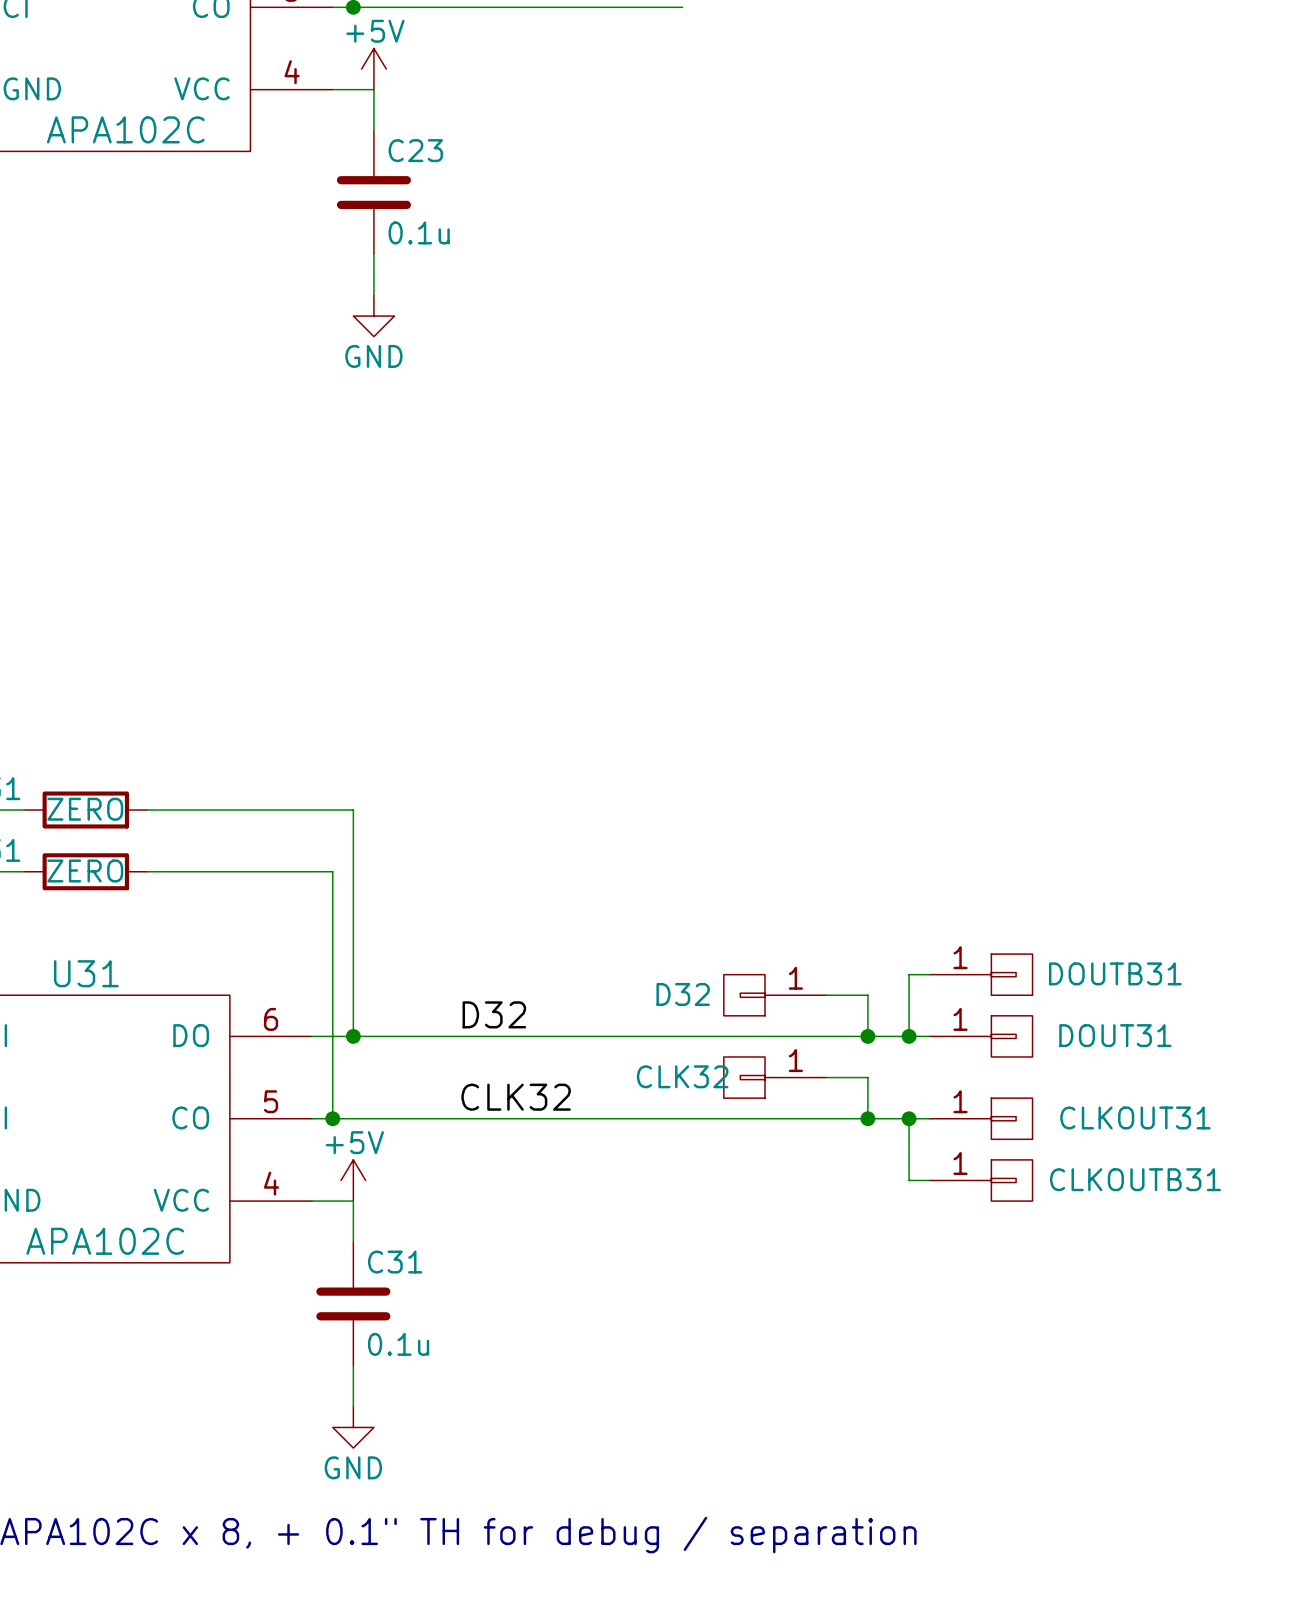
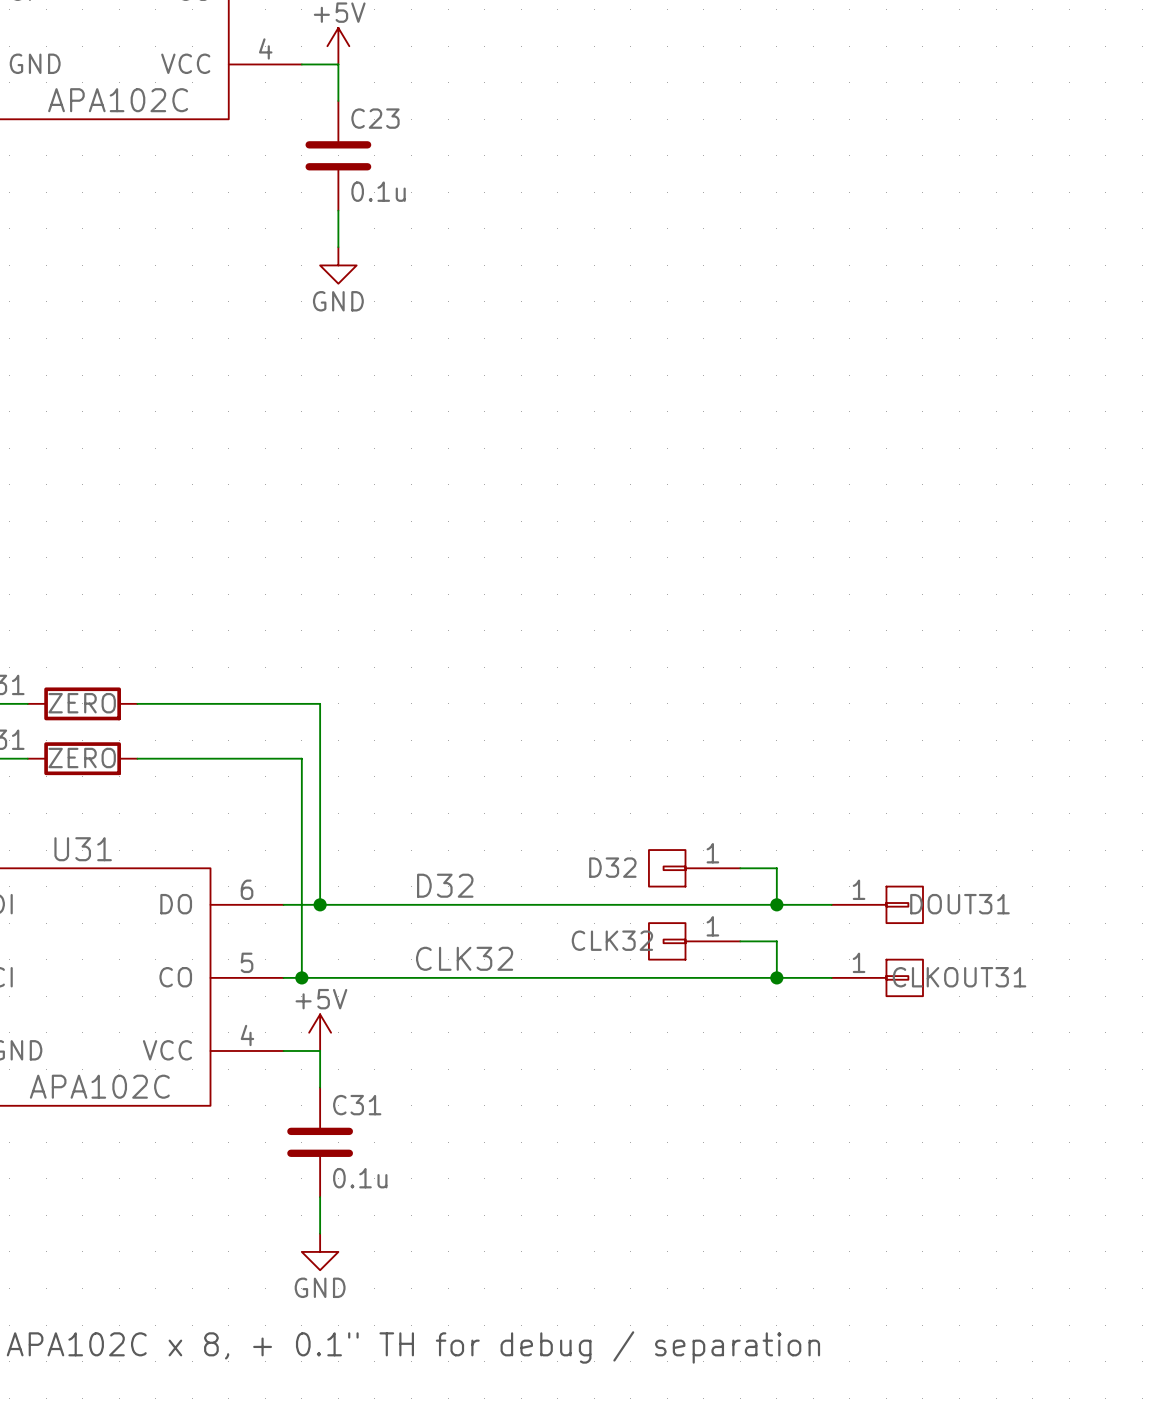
wire: (929, 974) (909, 974) (909, 1036) -> none
DOUTB31: (981, 974) -> none
DOUT31 name position: DOUT31 (1115, 1035) -> DOUT31 (959, 904)
junction: (909, 1036) -> none
CLKOUT31 name position: CLKOUT31 (1135, 1117) -> CLKOUT31 (959, 977)
wire: (909, 1118) (909, 1180) (929, 1180) -> none
junction: (909, 1118) -> none
CLKOUTB31: (981, 1180) -> none

